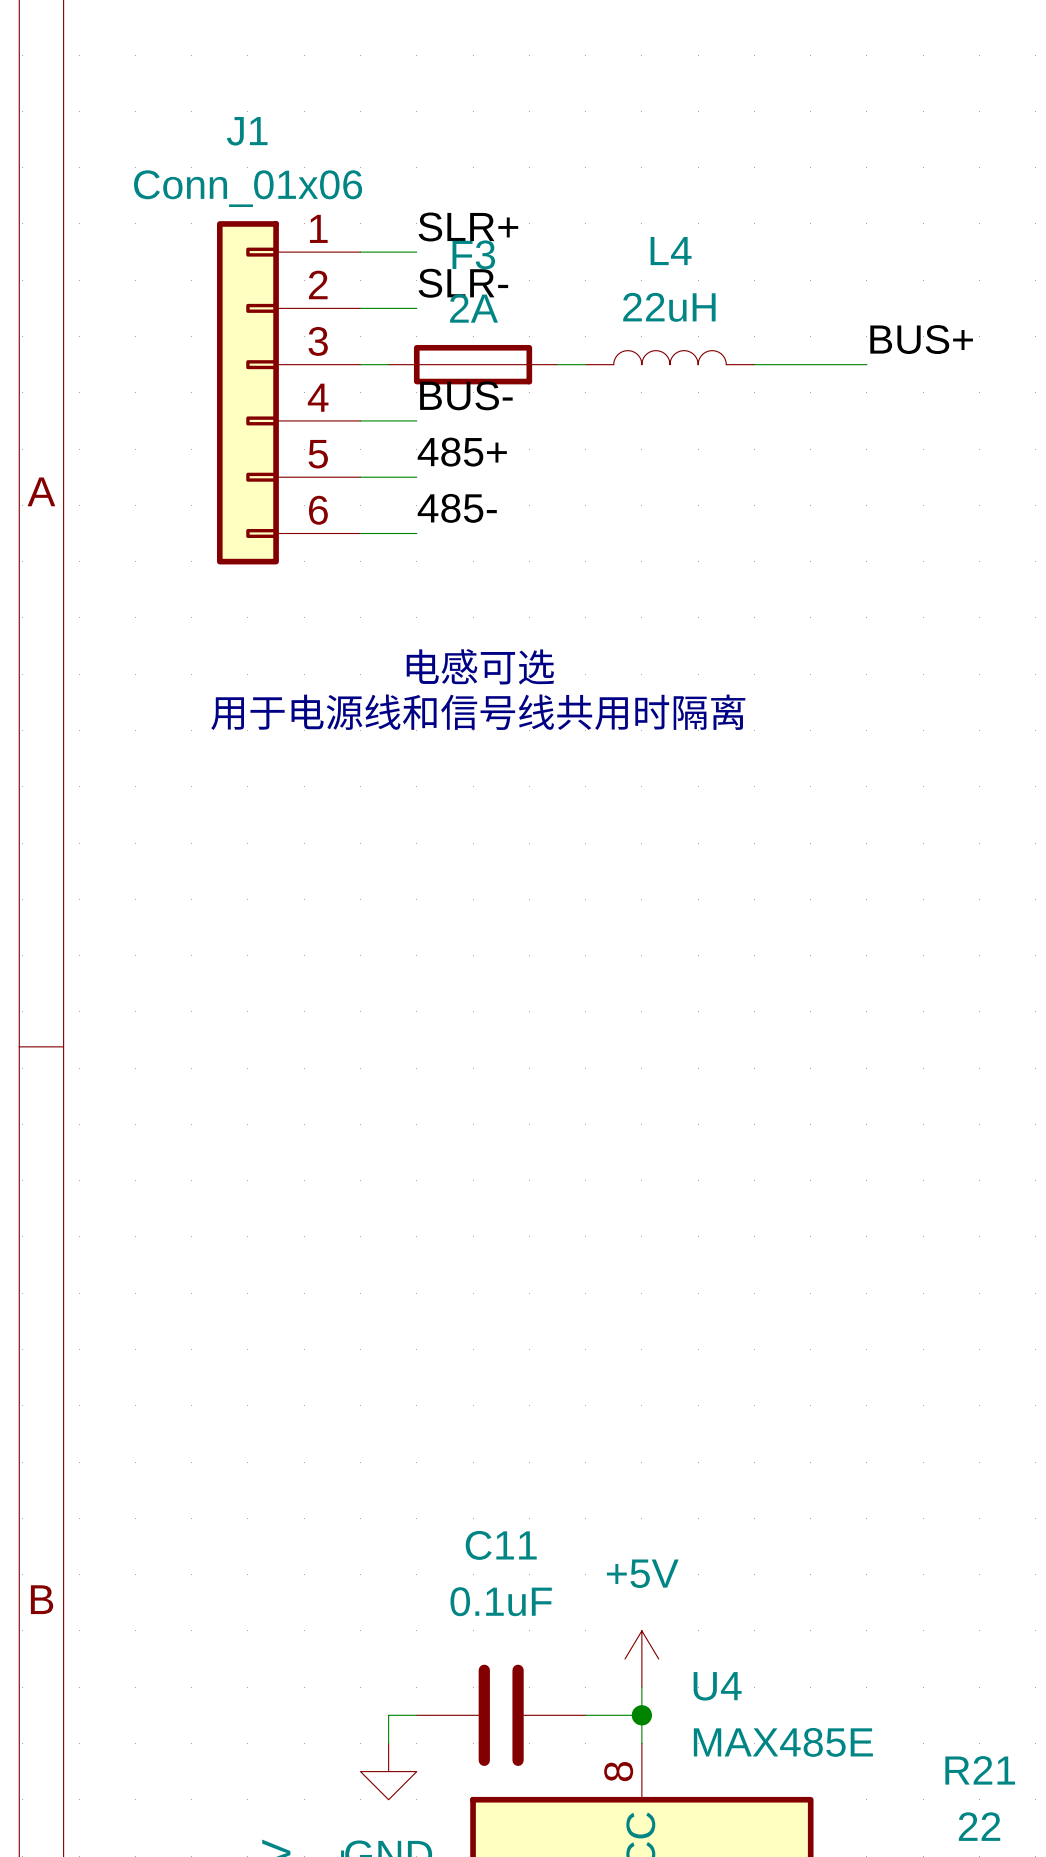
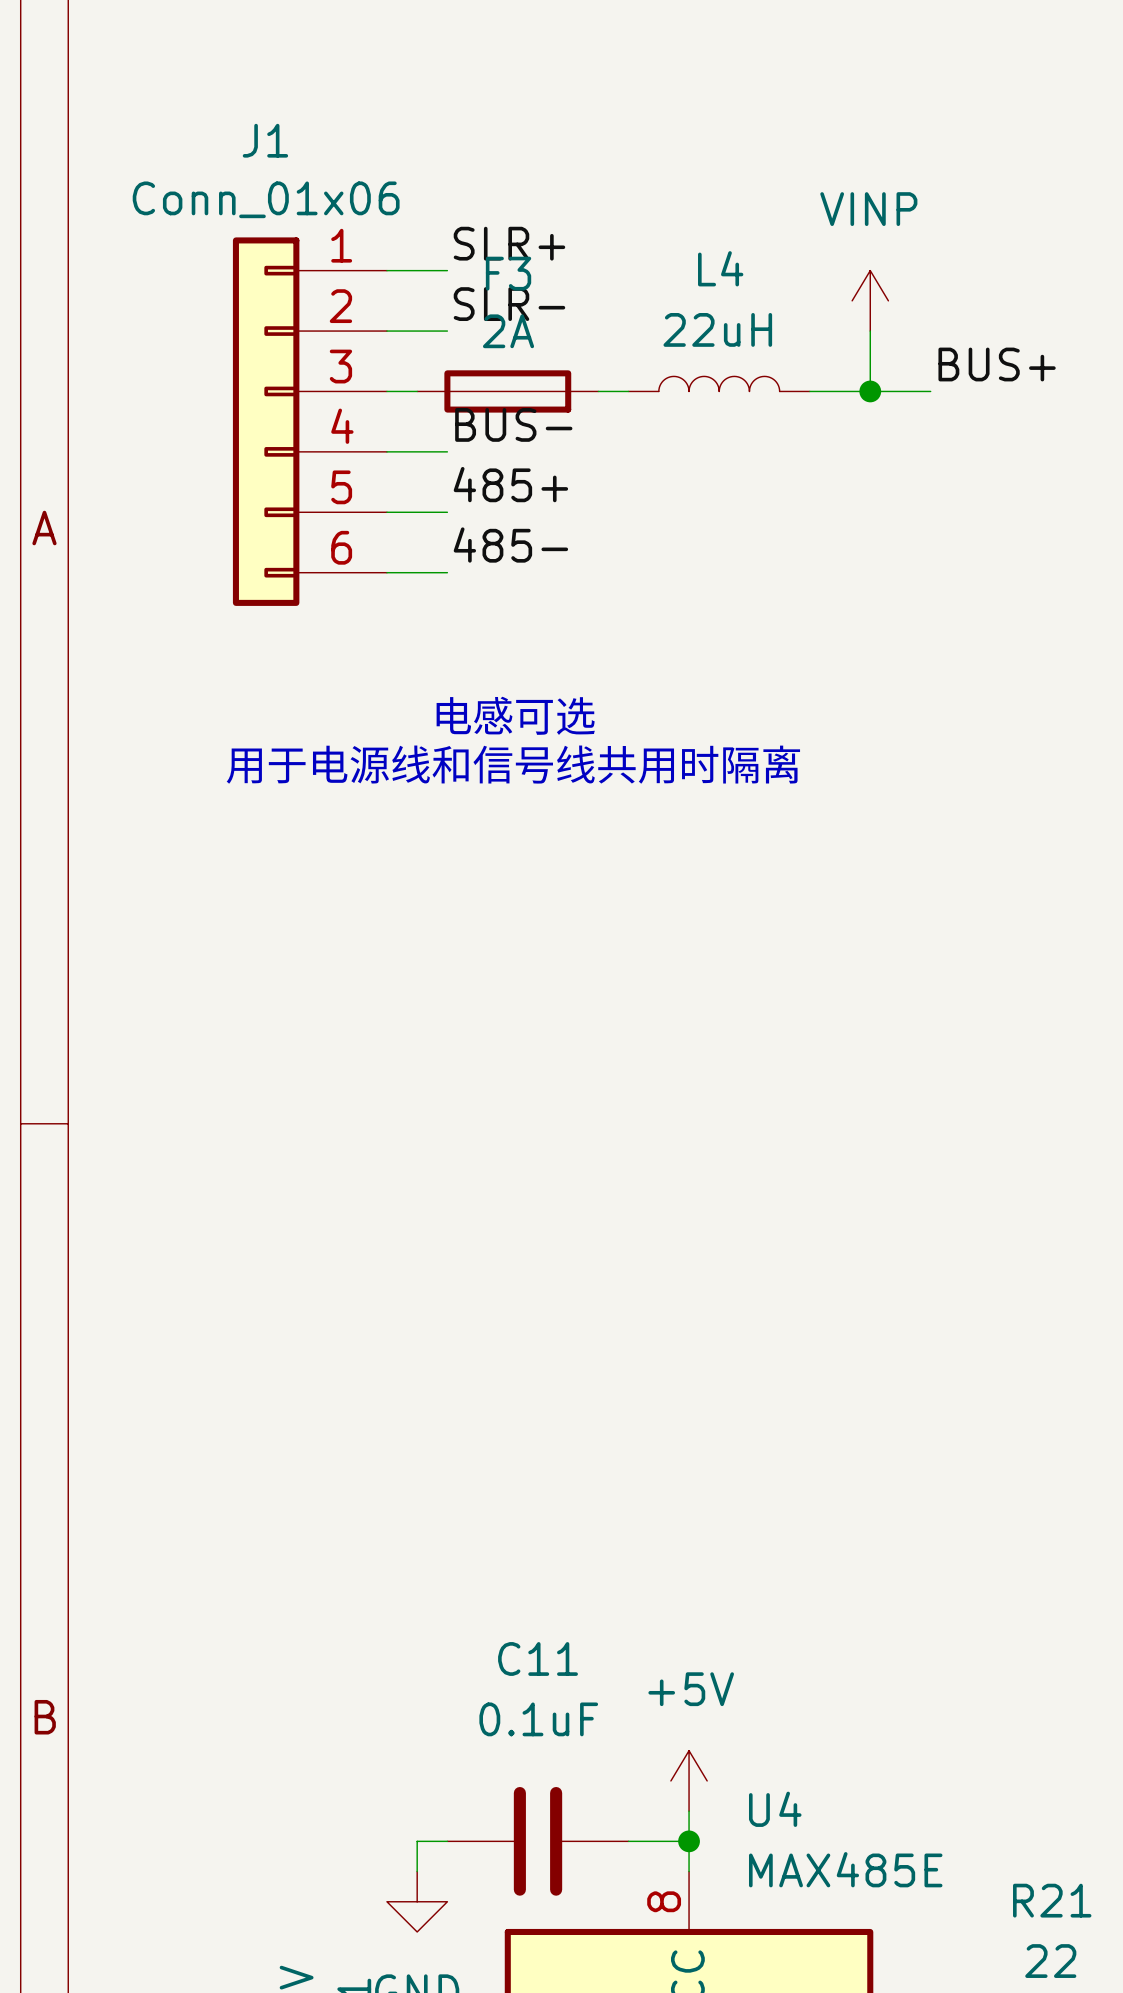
power symbol: none -> VINP (870, 300)
wire: none -> (870, 331) (870, 391)
junction: none -> (870, 391)

